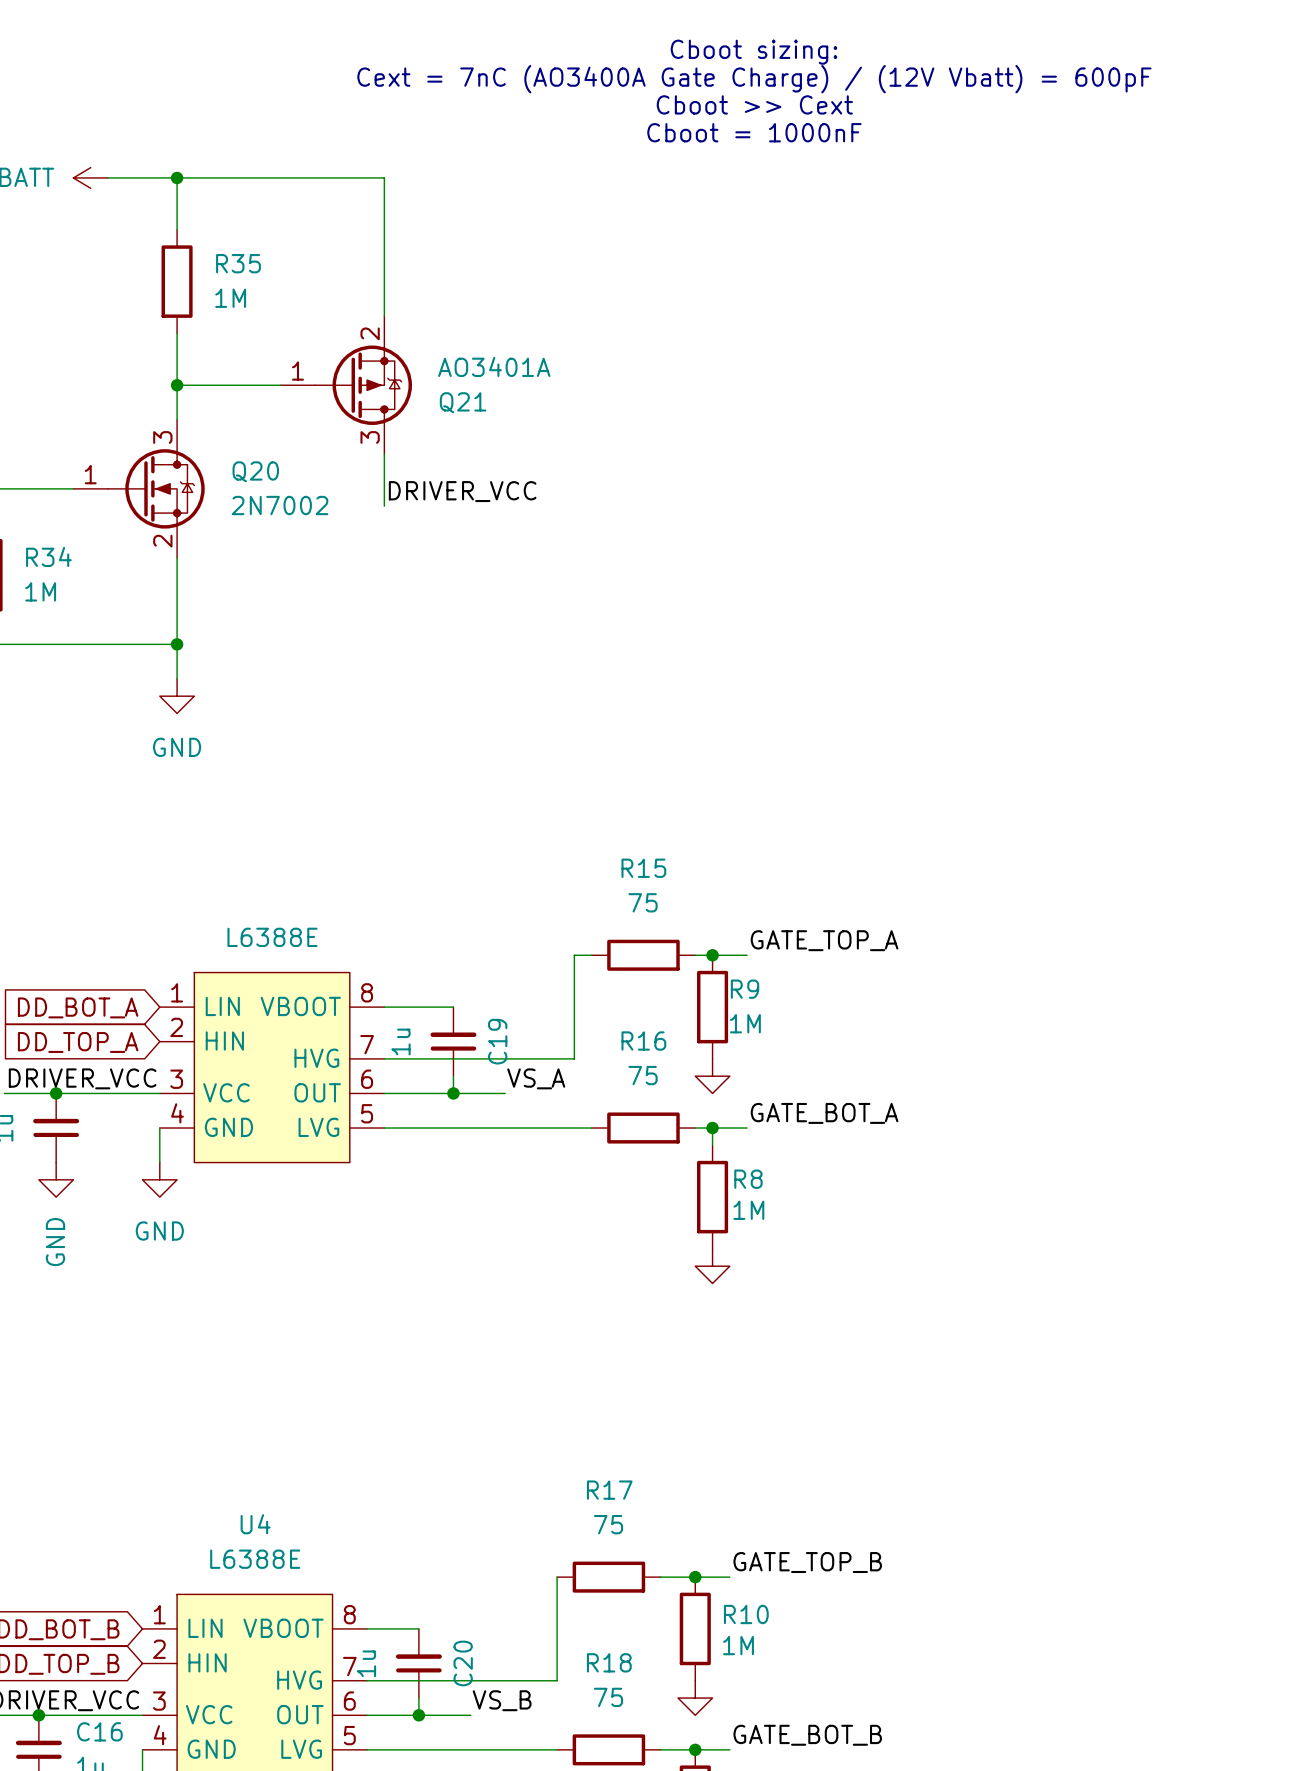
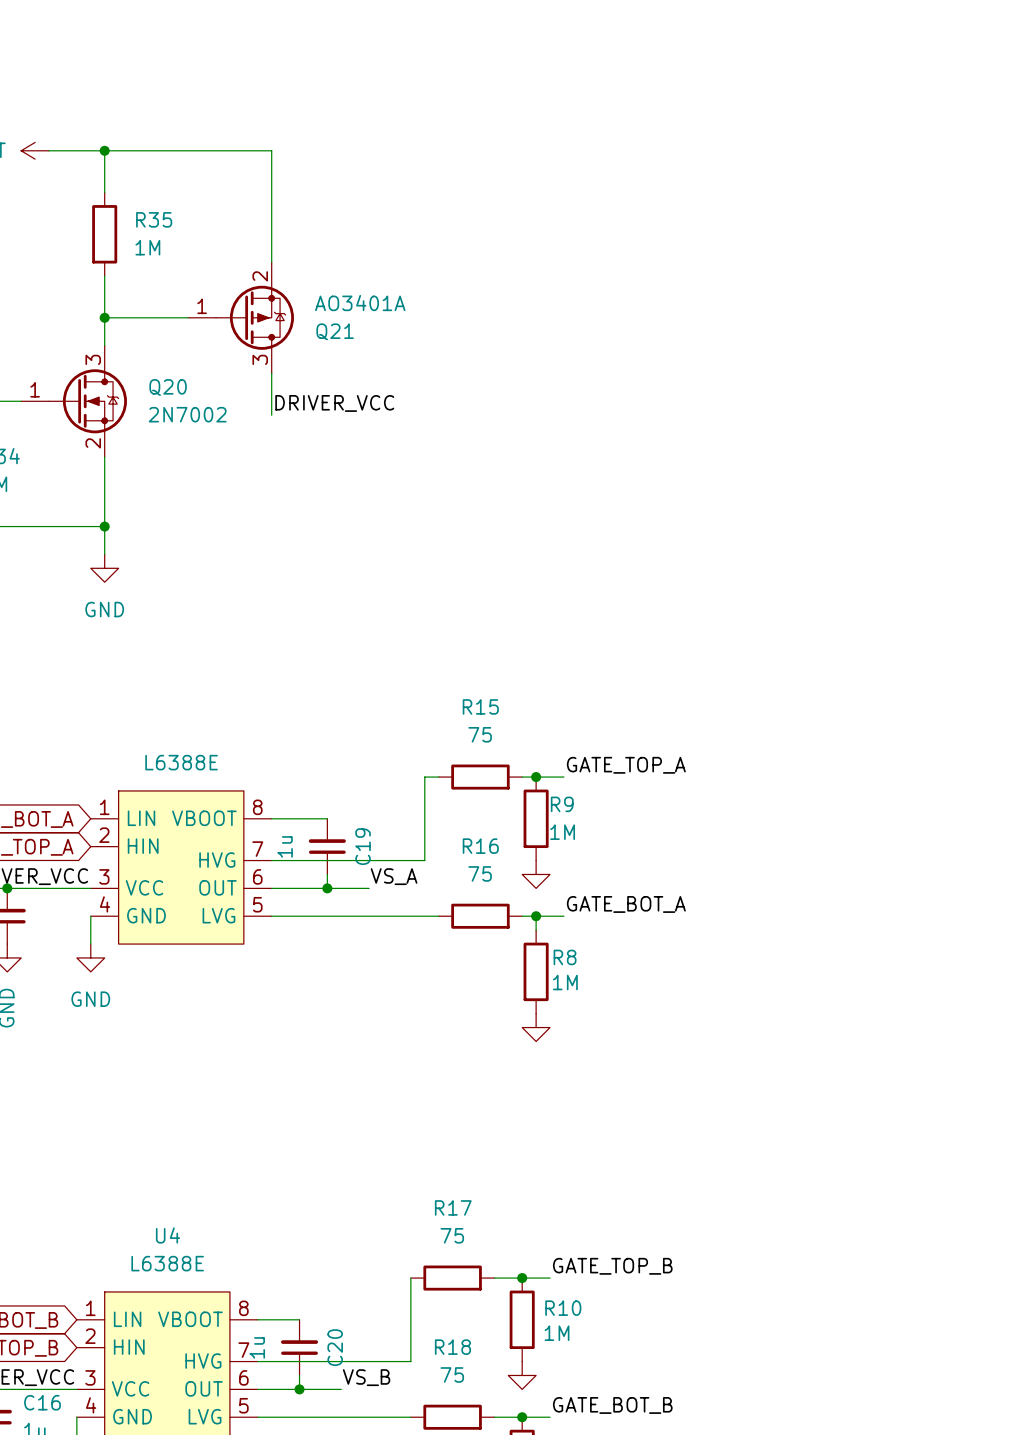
text: Cboot sizing: (754, 52) -> none
text: Cext = 7nC (AO3400A Gate Charge) / (12V Vbatt) = 600pF (754, 79) -> none
text: Cboot >> Cext (754, 104) -> none
text: Cboot = 1000nF (754, 132) -> none

